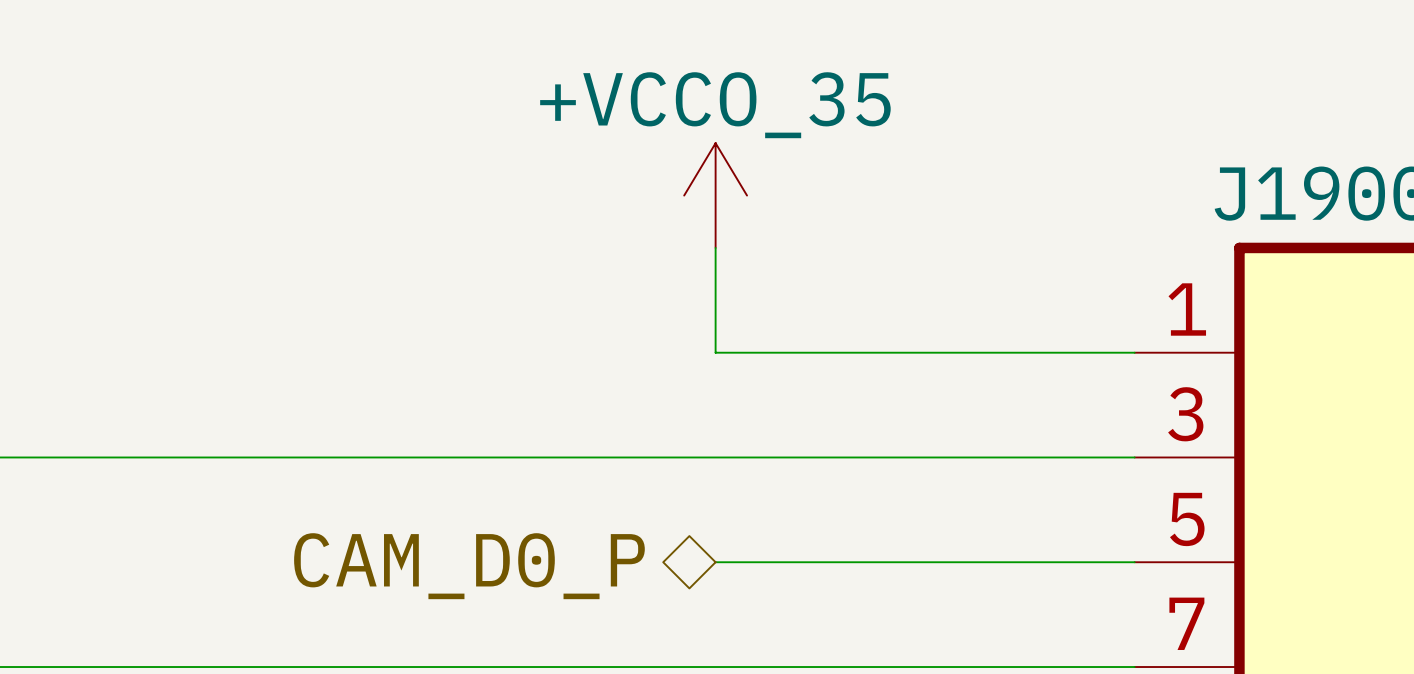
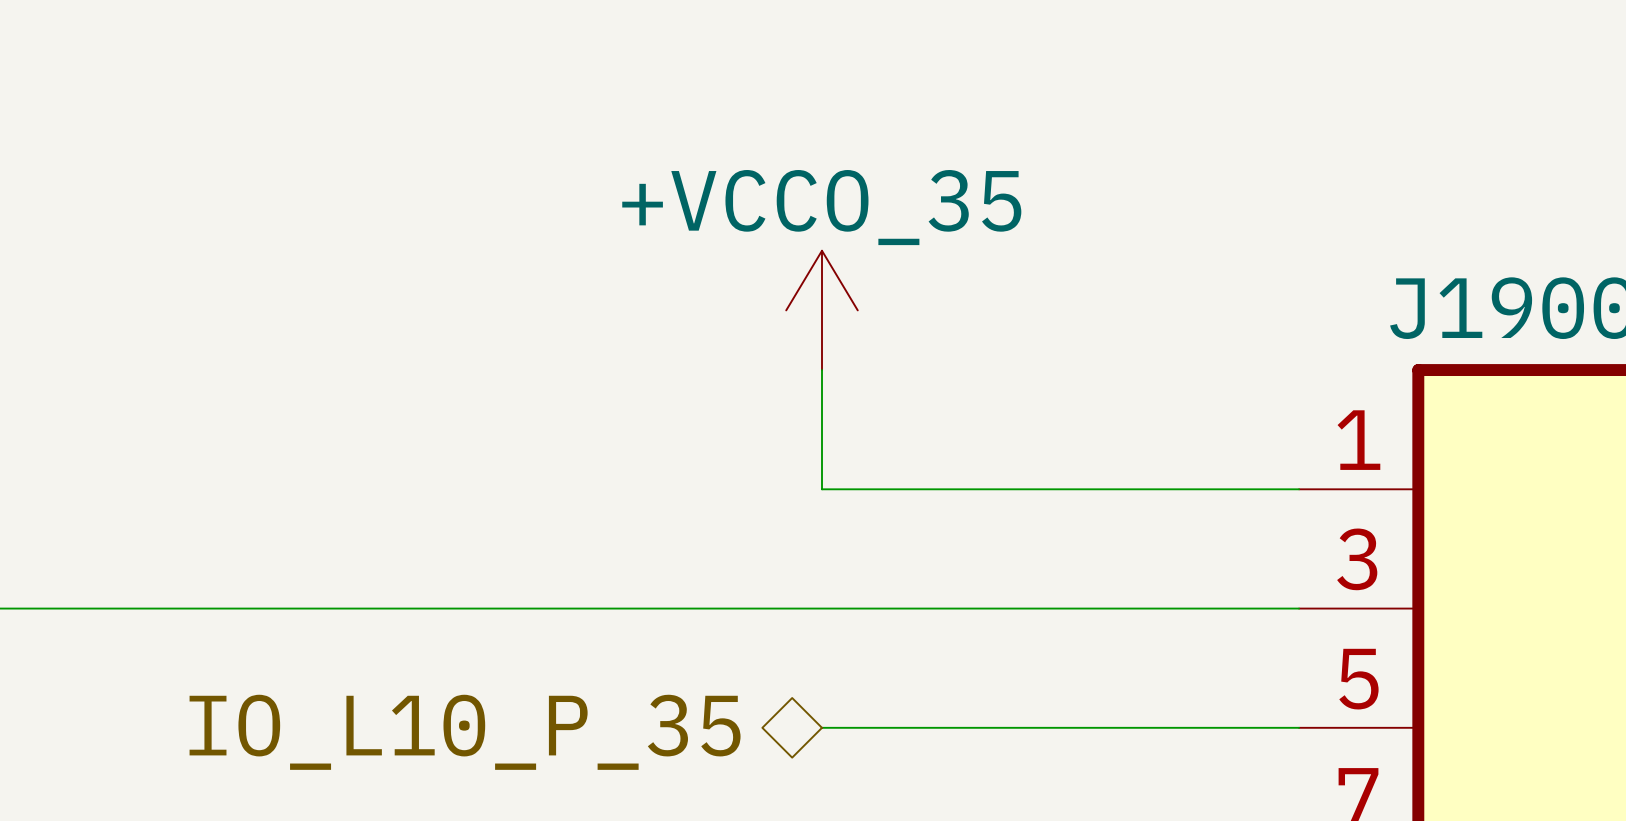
hierarchical label: CAM_D0_P (469, 566) -> IO_L10_P_35 (465, 732)

